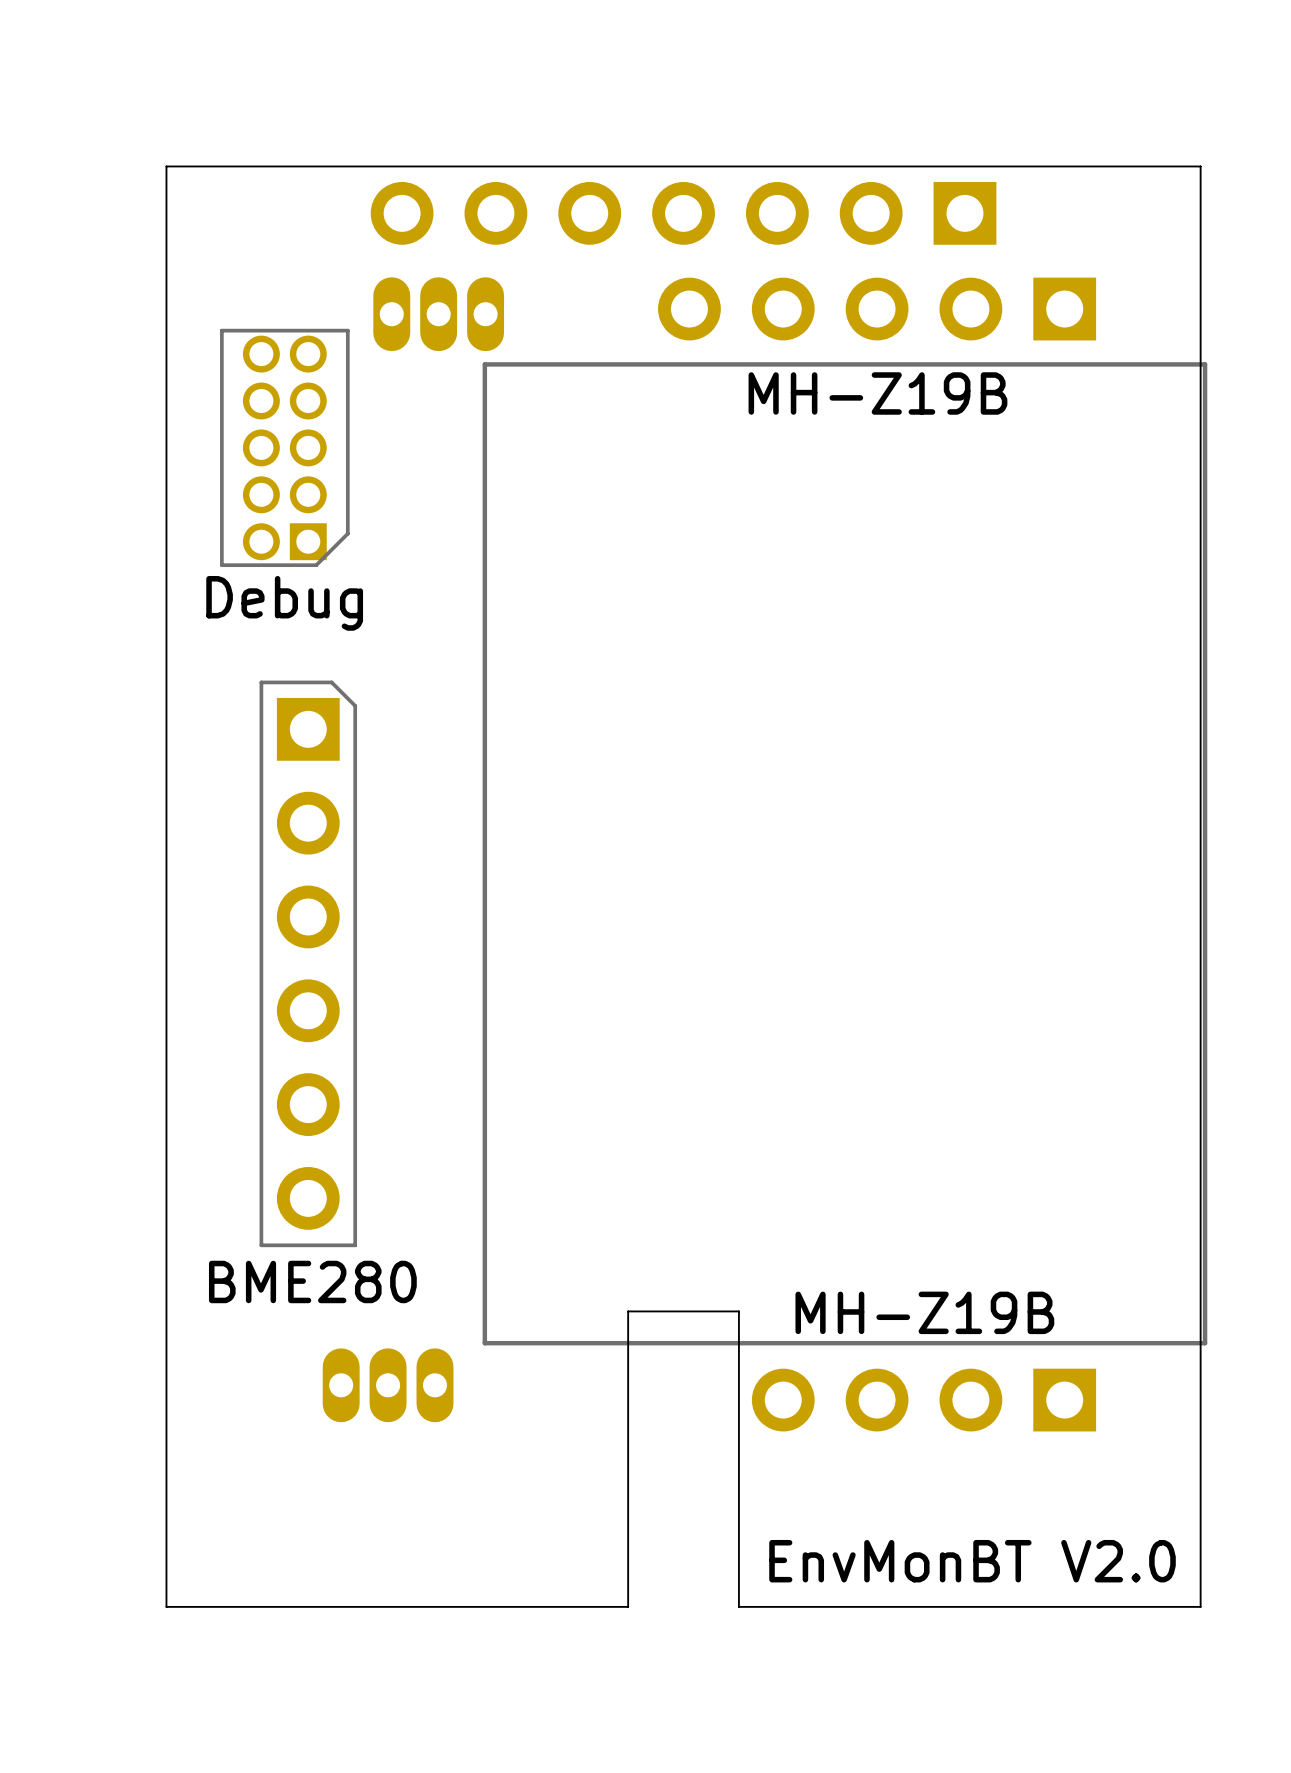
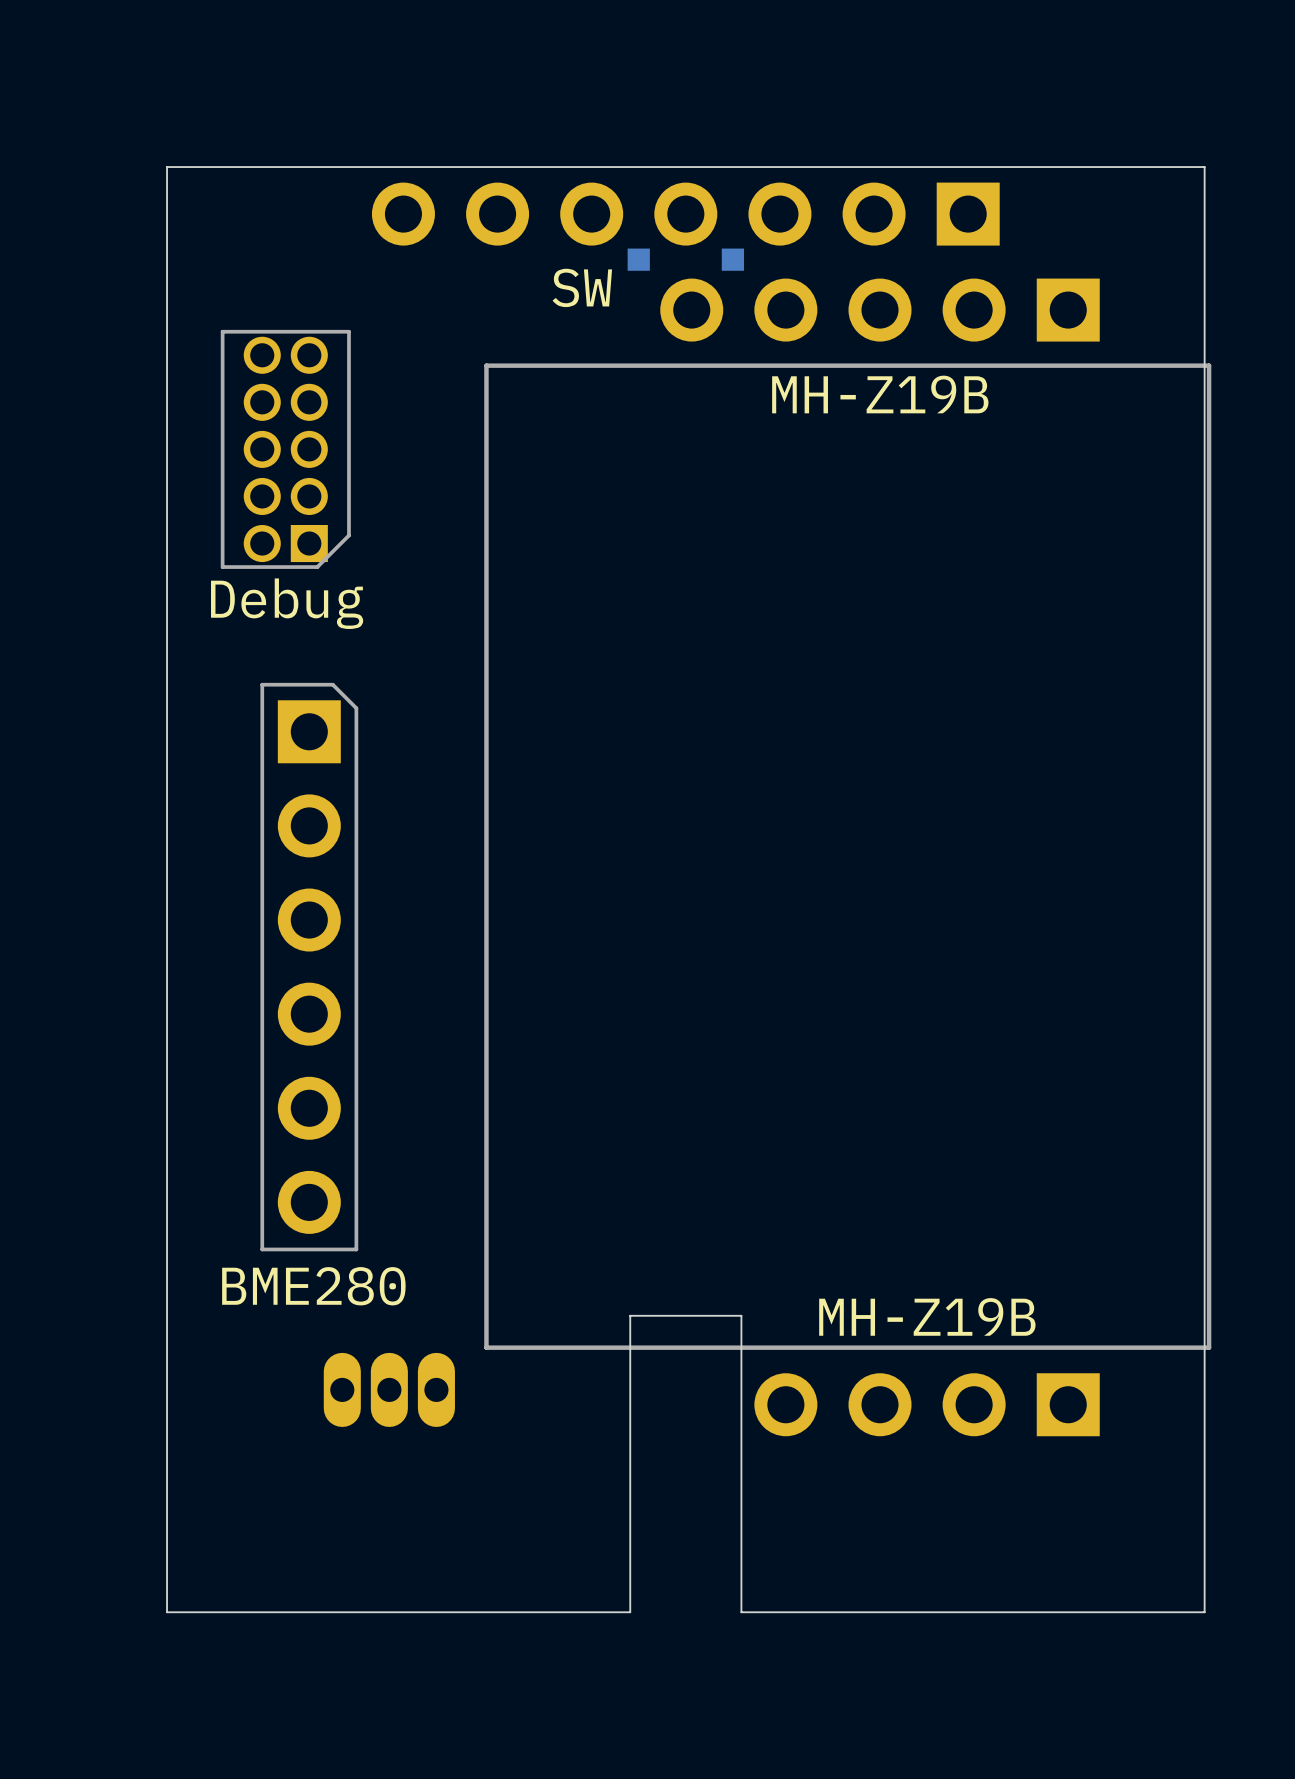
SW: none -> (685, 259)
part: (438, 314) -> none
text: EnvMonBT V2.0 (972, 1561) -> none

